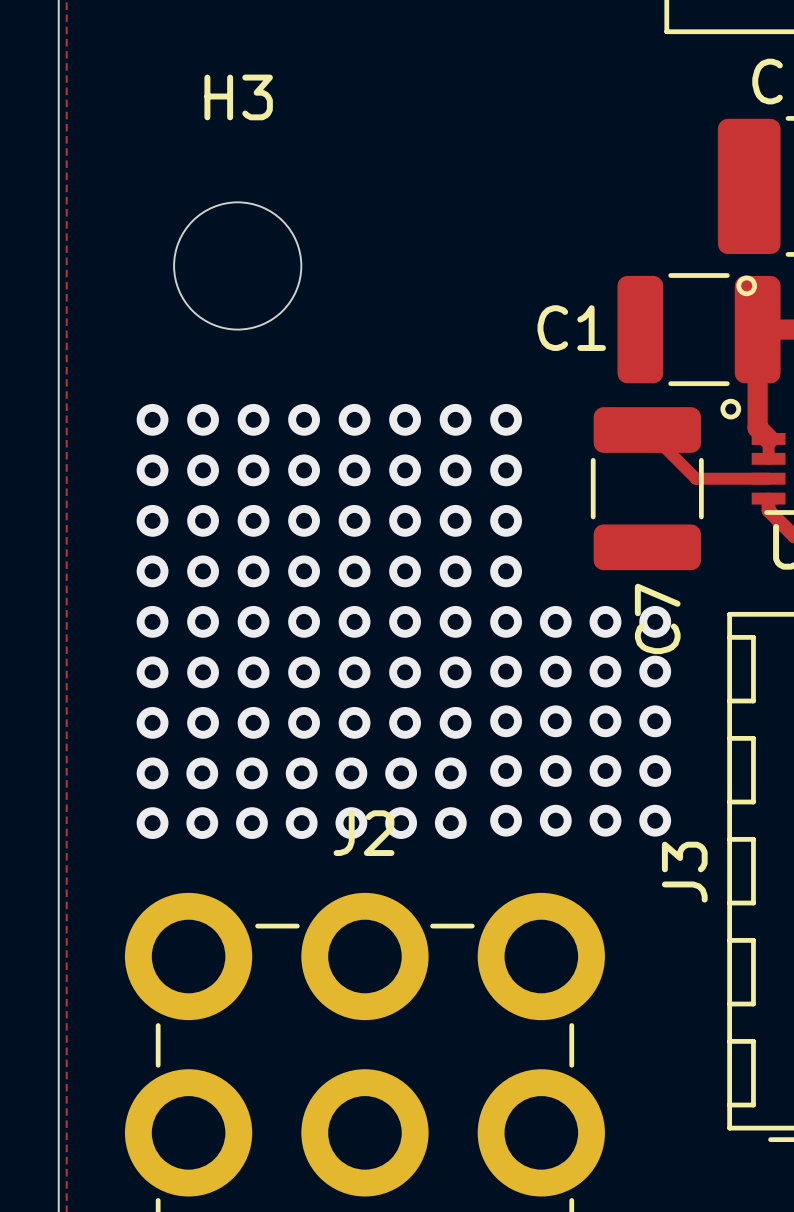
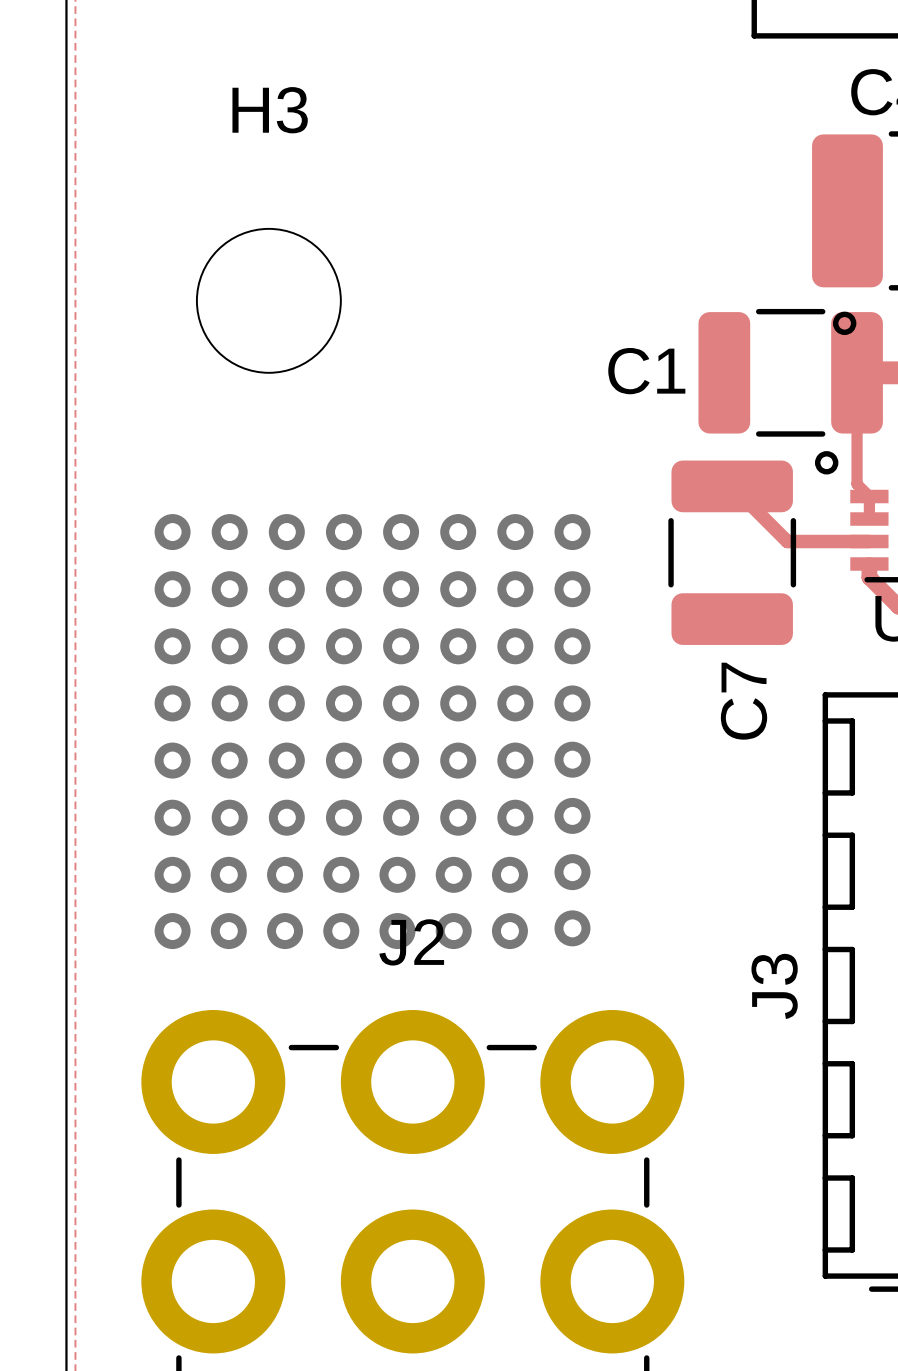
track width: thick (757, 329) (757, 428) (768, 438) (768, 458) -> thin (857, 372) (857, 484) (869, 496) (869, 519)
via: (152, 419) -> none
via: (203, 419) -> none
via: (253, 419) -> none
via: (304, 419) -> none
via: (354, 419) -> none
via: (405, 419) -> none
via: (455, 419) -> none
via: (506, 419) -> none
via: (555, 621) -> none
via: (605, 621) -> none
via: (655, 621) -> none
via: (555, 671) -> none
via: (605, 671) -> none
via: (655, 671) -> none
via: (555, 721) -> none
via: (605, 721) -> none
via: (655, 721) -> none
via: (555, 770) -> none
via: (605, 770) -> none
via: (655, 770) -> none
via: (555, 820) -> none
via: (605, 820) -> none
via: (655, 820) -> none

